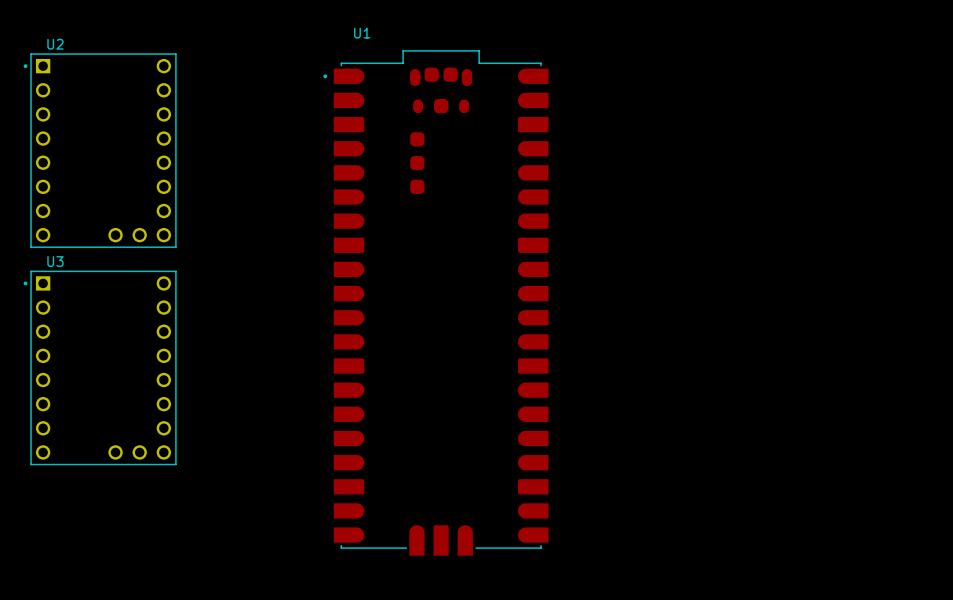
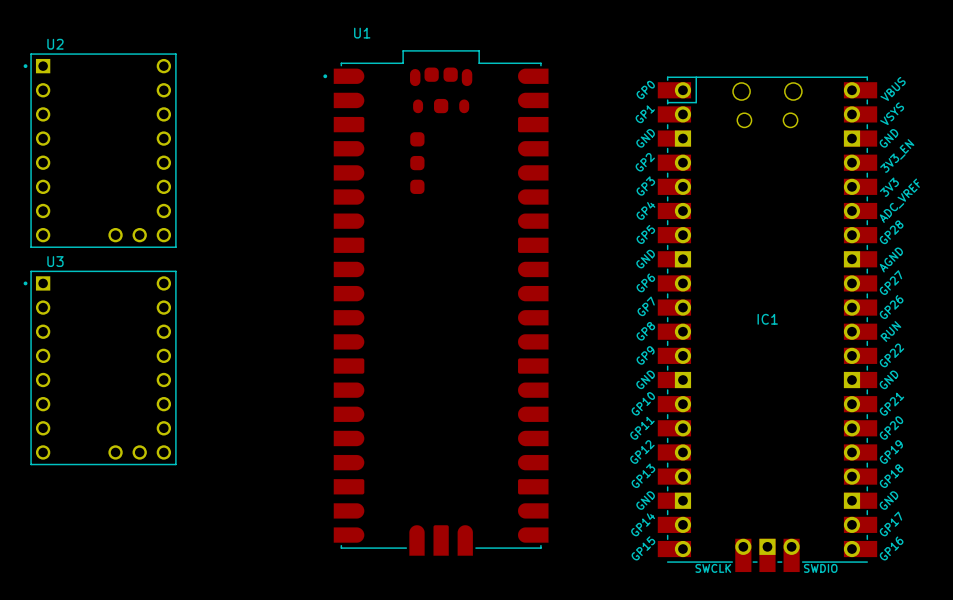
IC1: none -> (767, 324)

